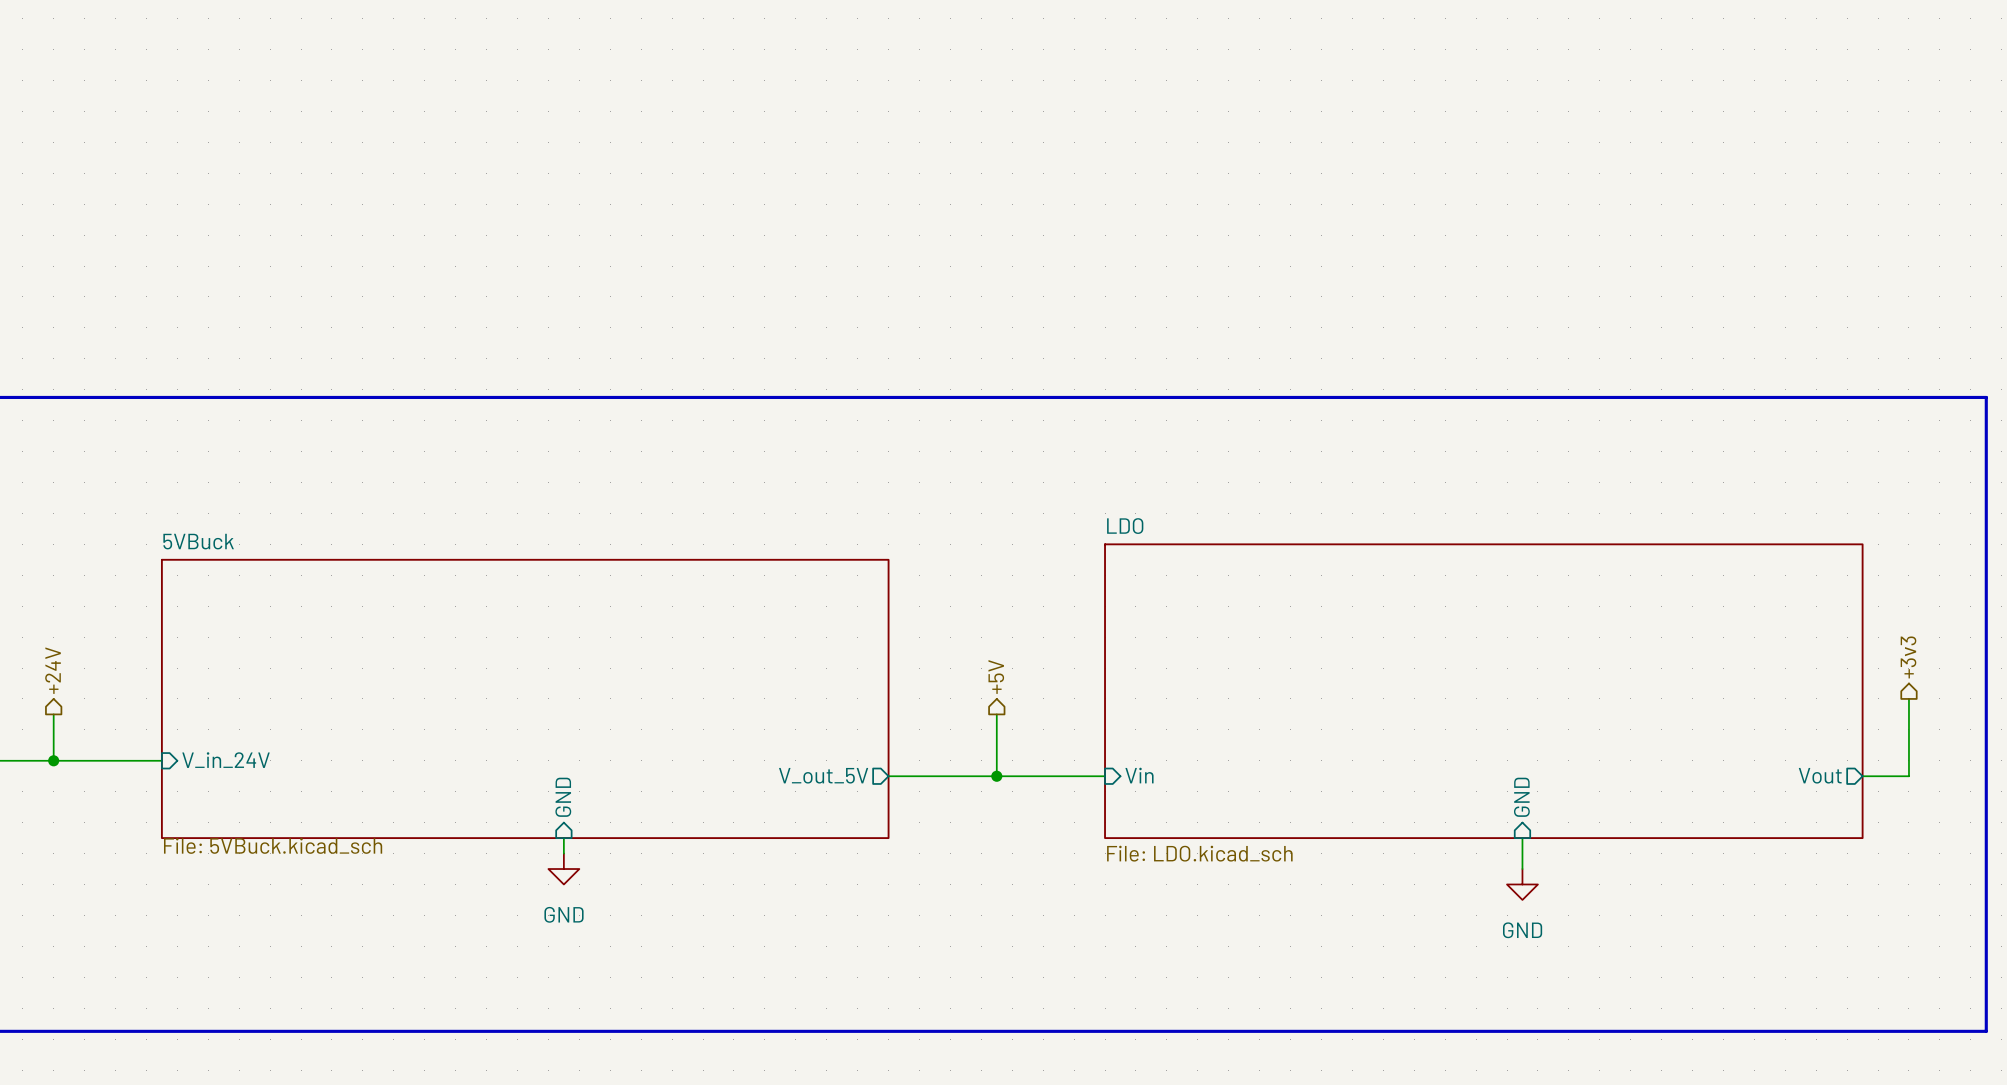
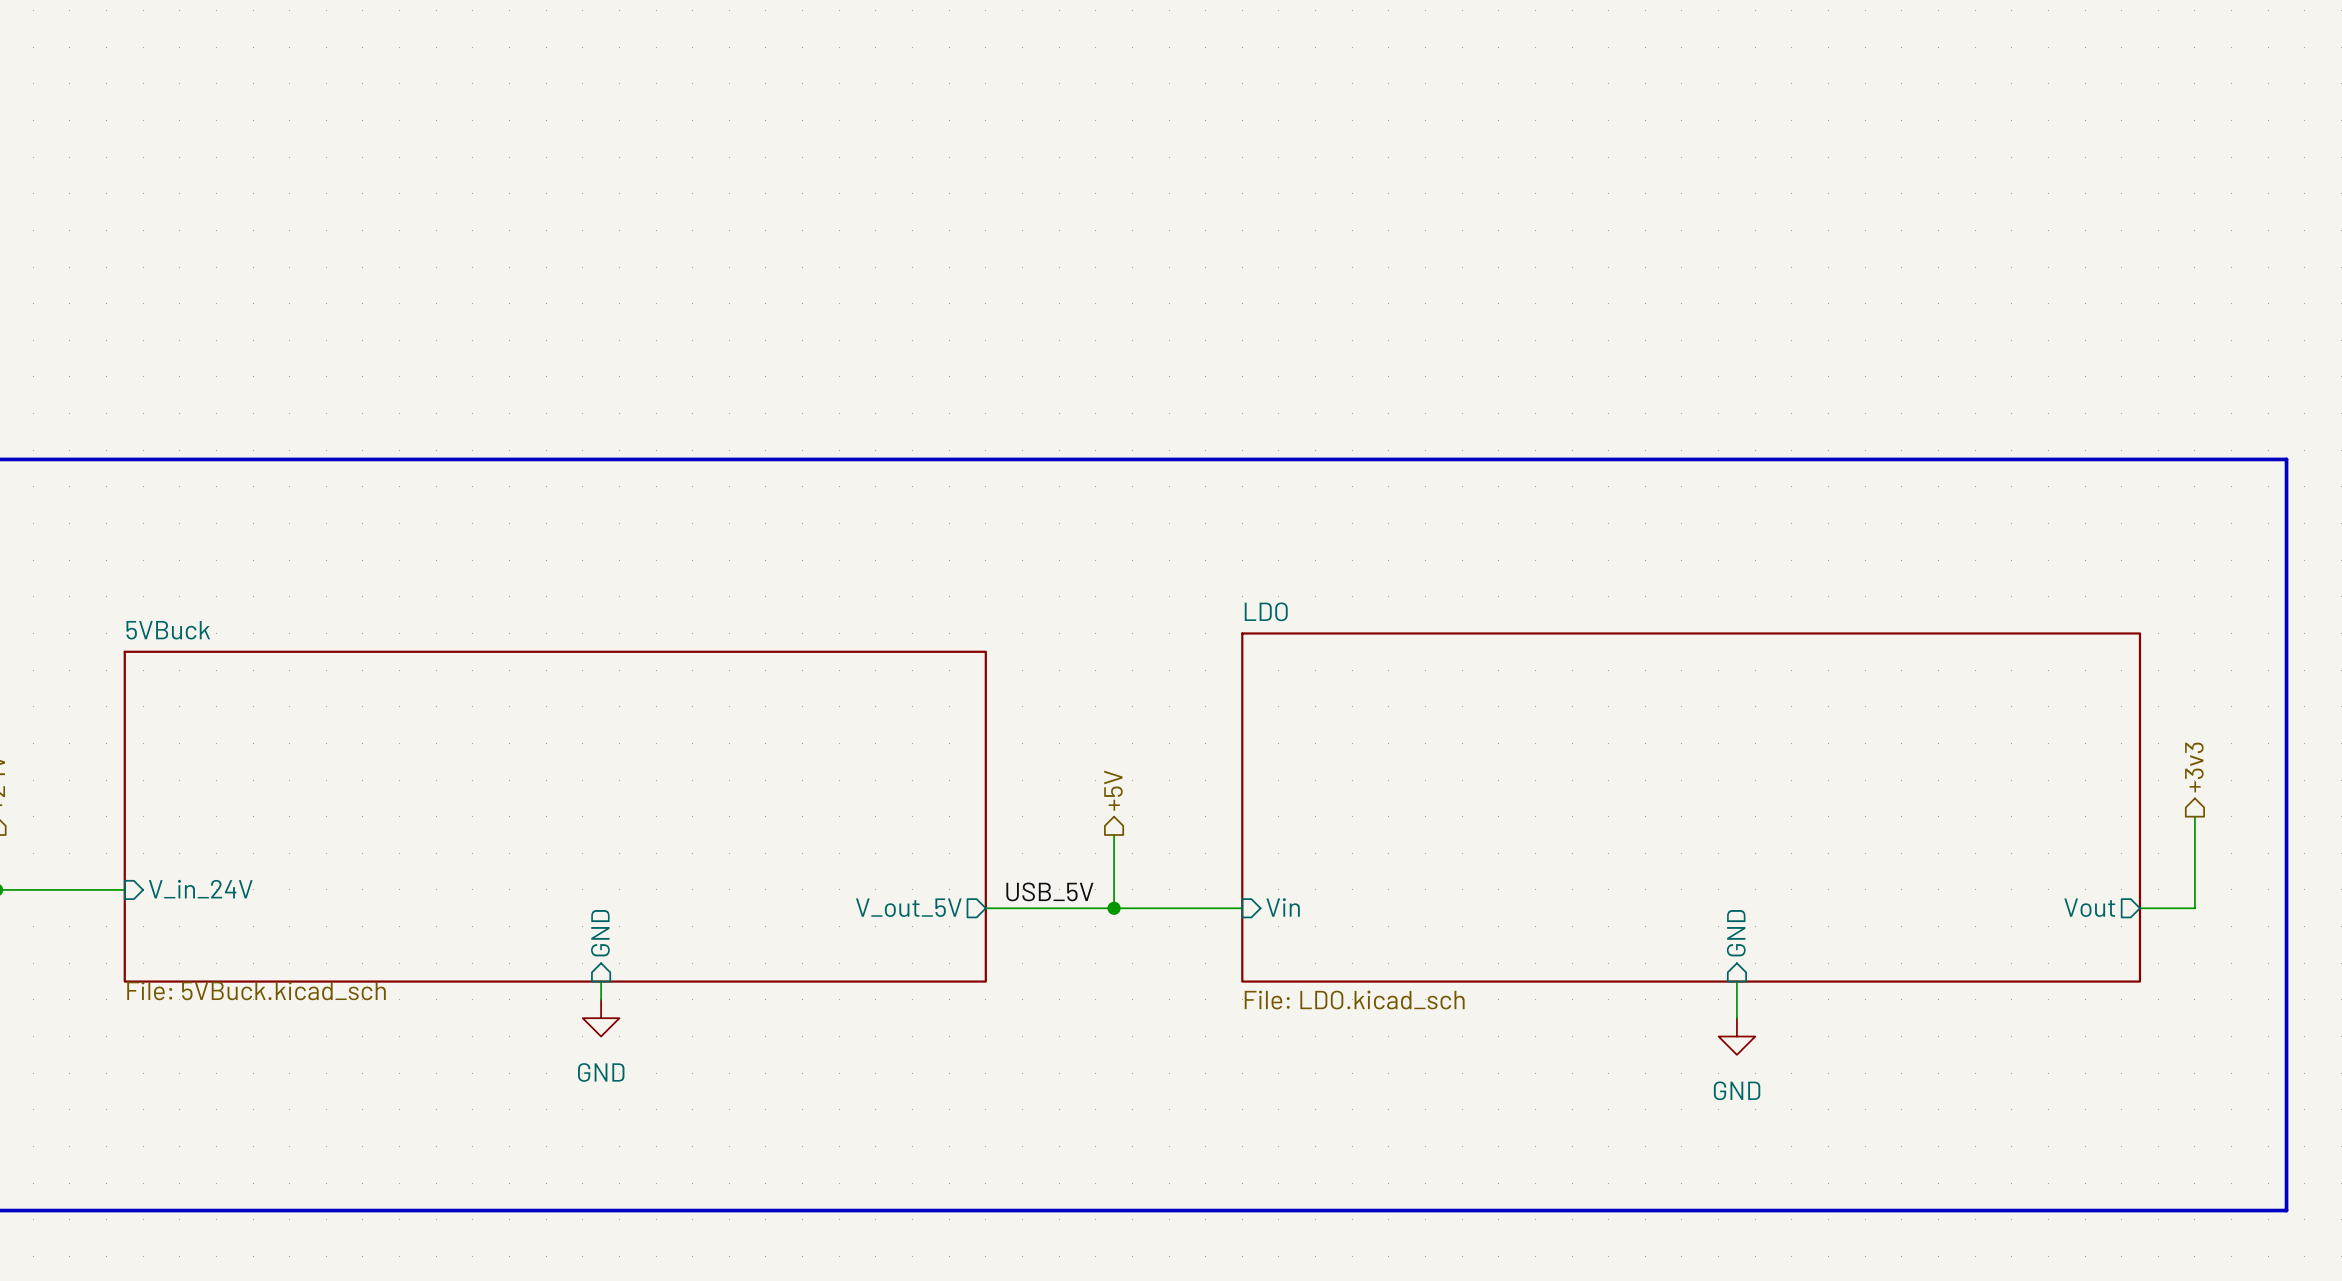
label: none -> USB_5V (1049, 891)

